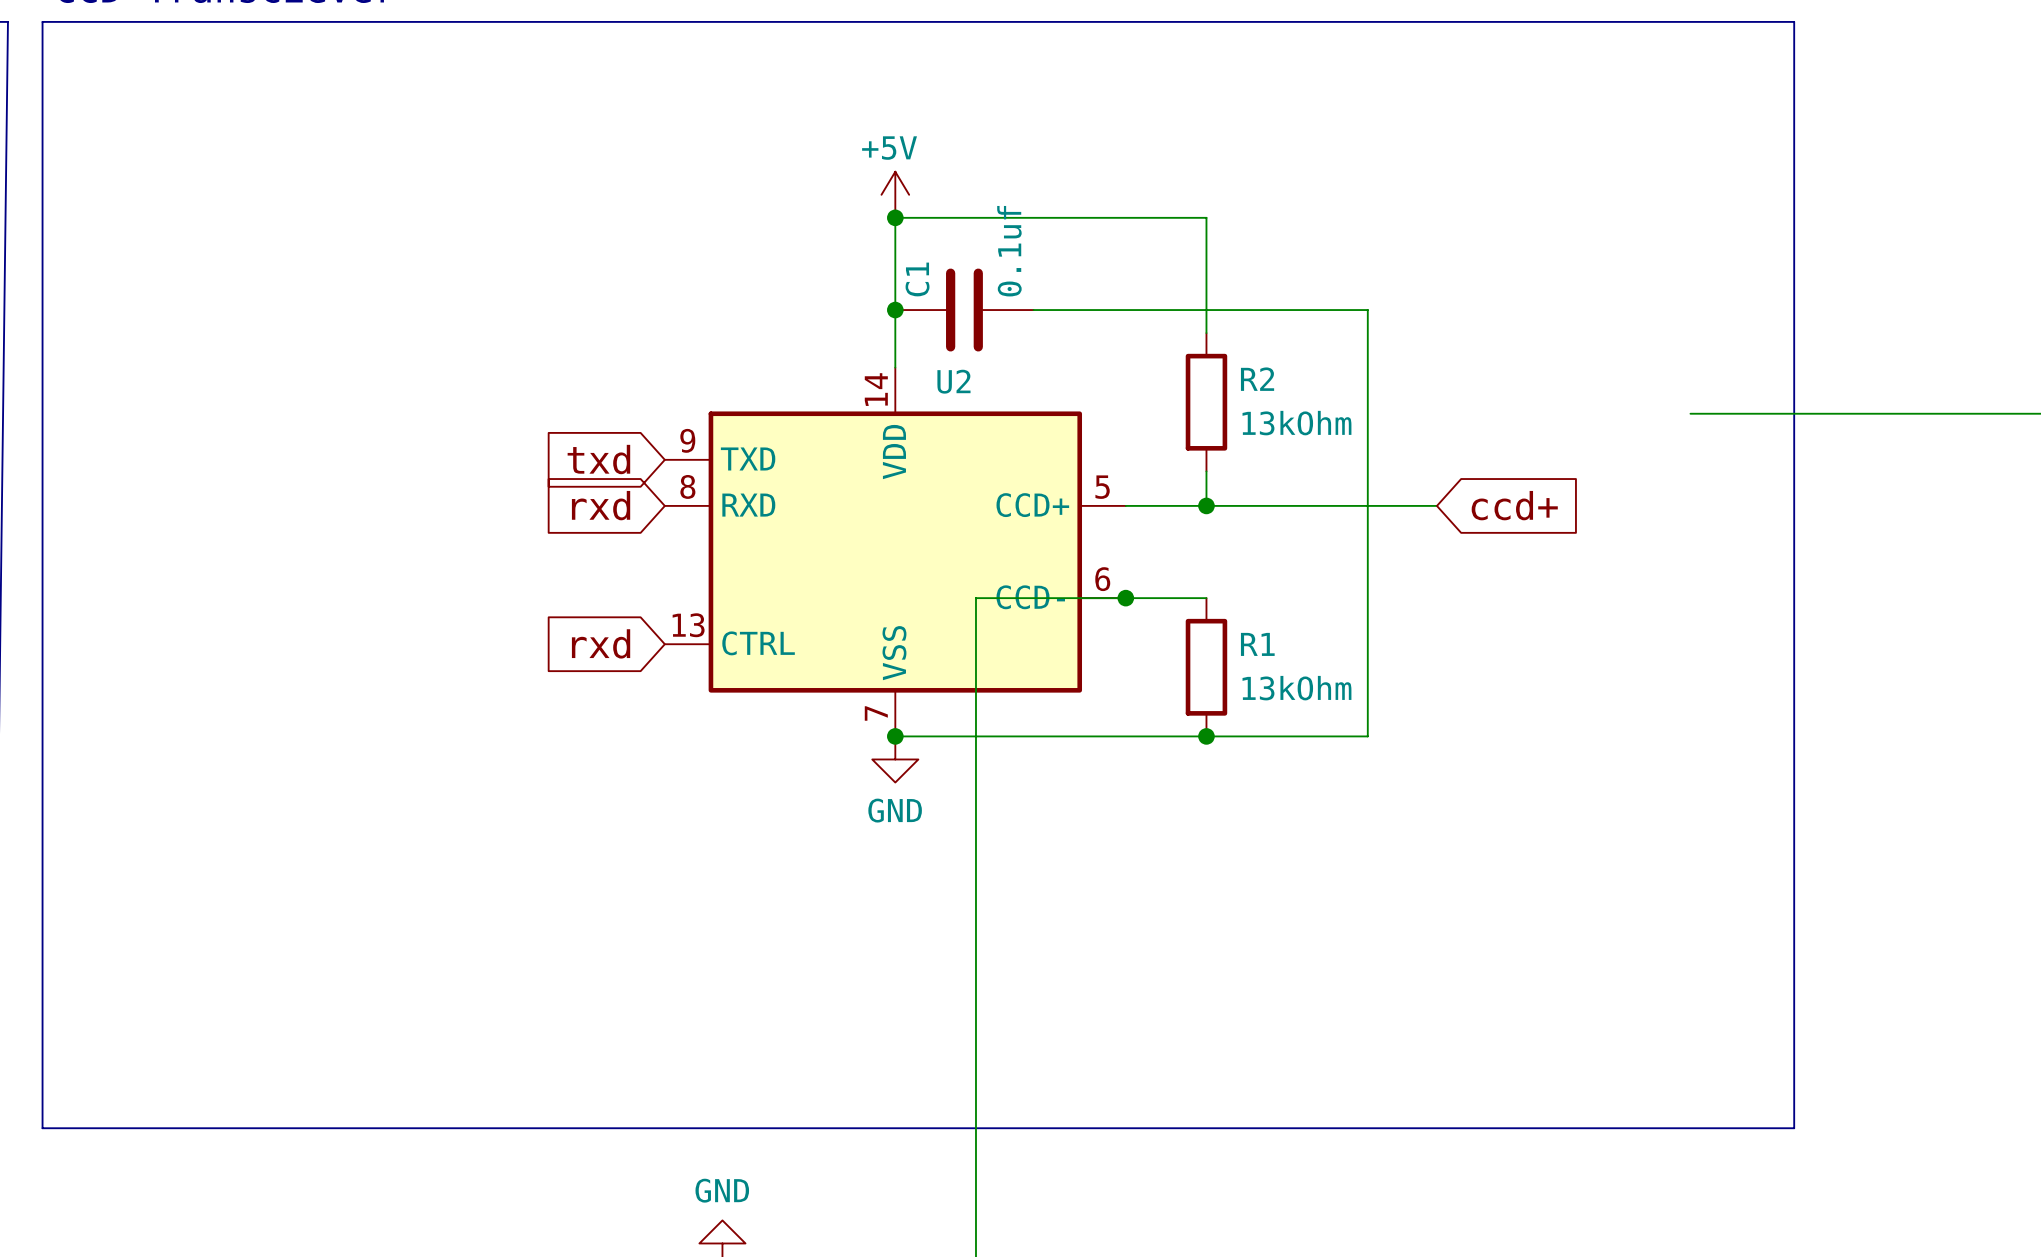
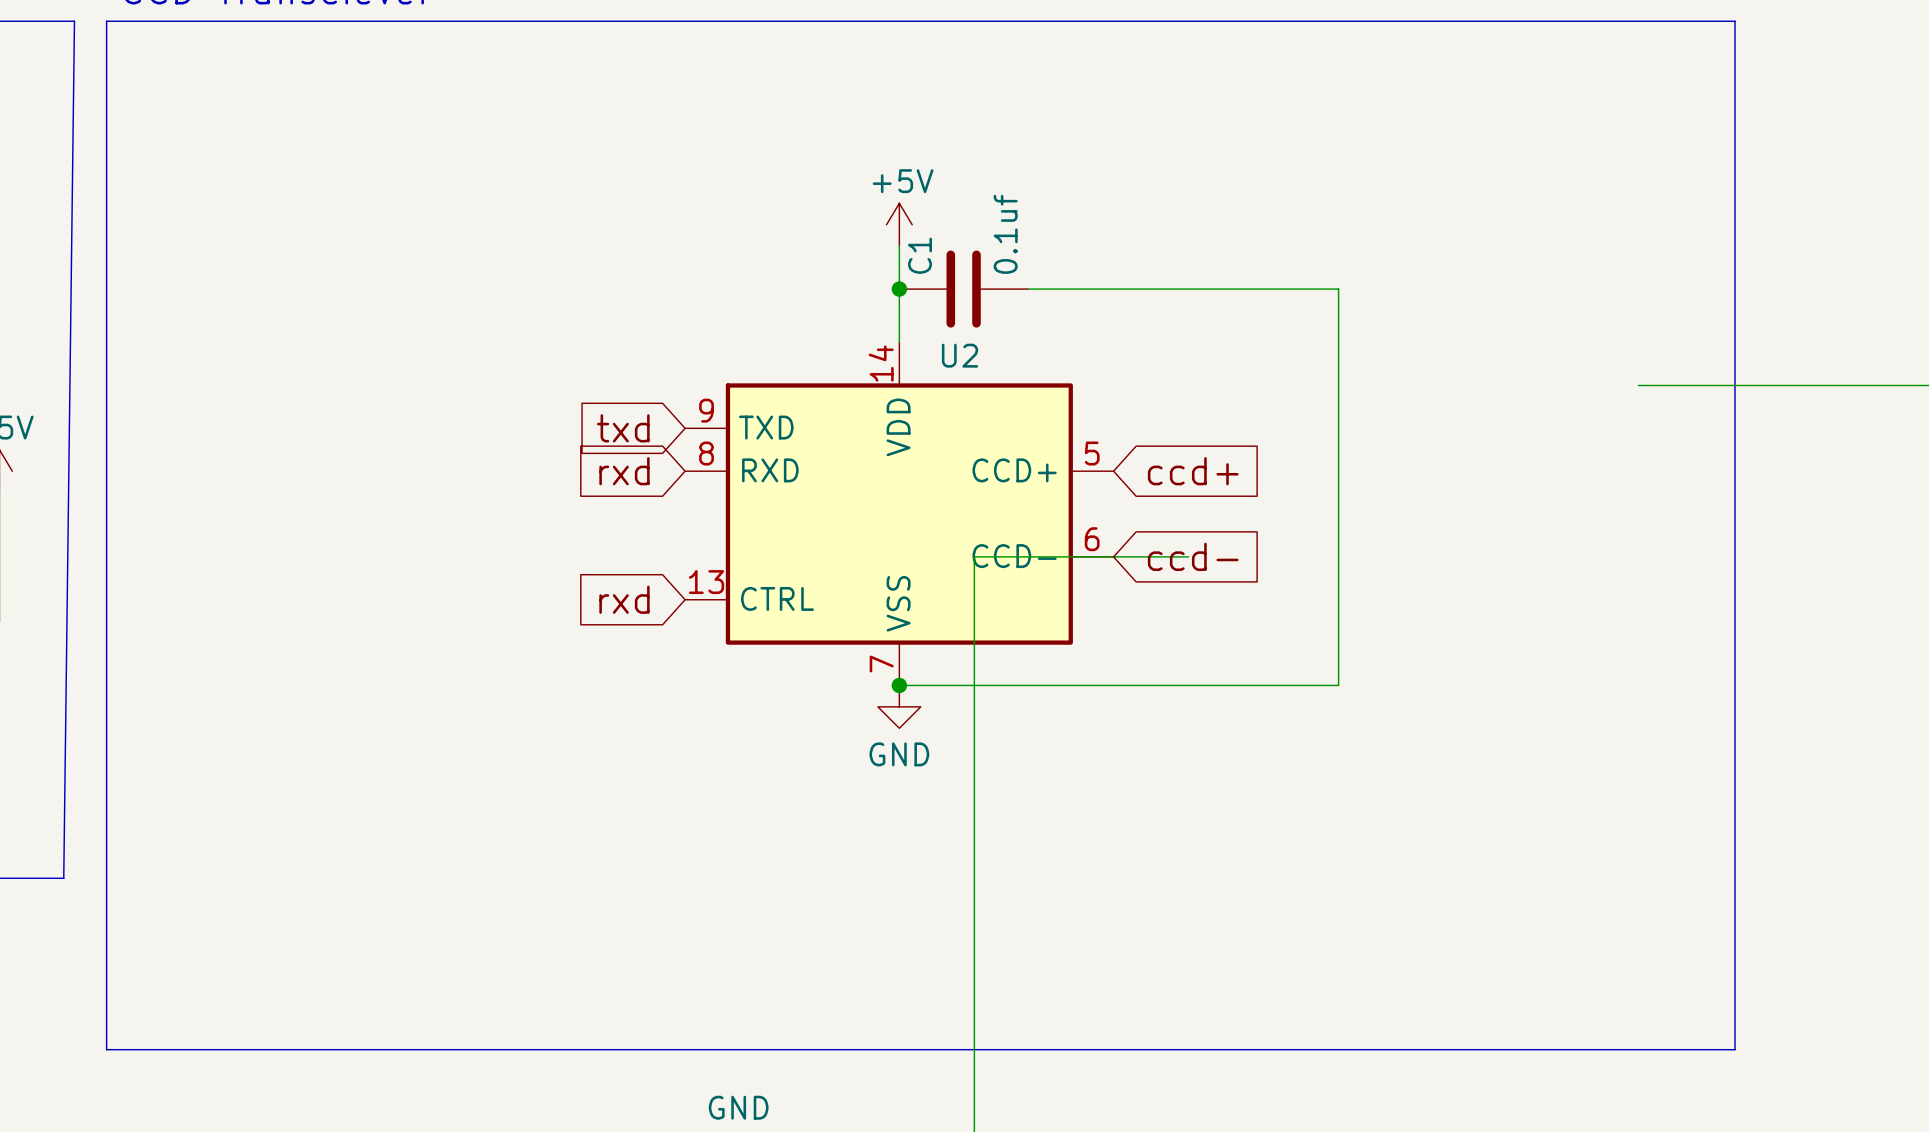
power symbol position: +5V (895, 194) -> +5V (899, 224)
junction: (895, 217) -> none
wire: (895, 263) (895, 217) (1206, 217) (1206, 333) -> none
R2: 13kOhm (1206, 402) -> none
wire: (1206, 471) (1206, 505) -> none
wire: (1125, 505) (1436, 505) -> none
junction: (1206, 505) -> none
global label position: ccd+ (1514, 505) -> ccd+ (1193, 471)
global label: none -> ccd- (1193, 556)
junction: (1125, 598) -> none
R1: 13kOhm (1206, 667) -> none
junction: (1206, 736) -> none

